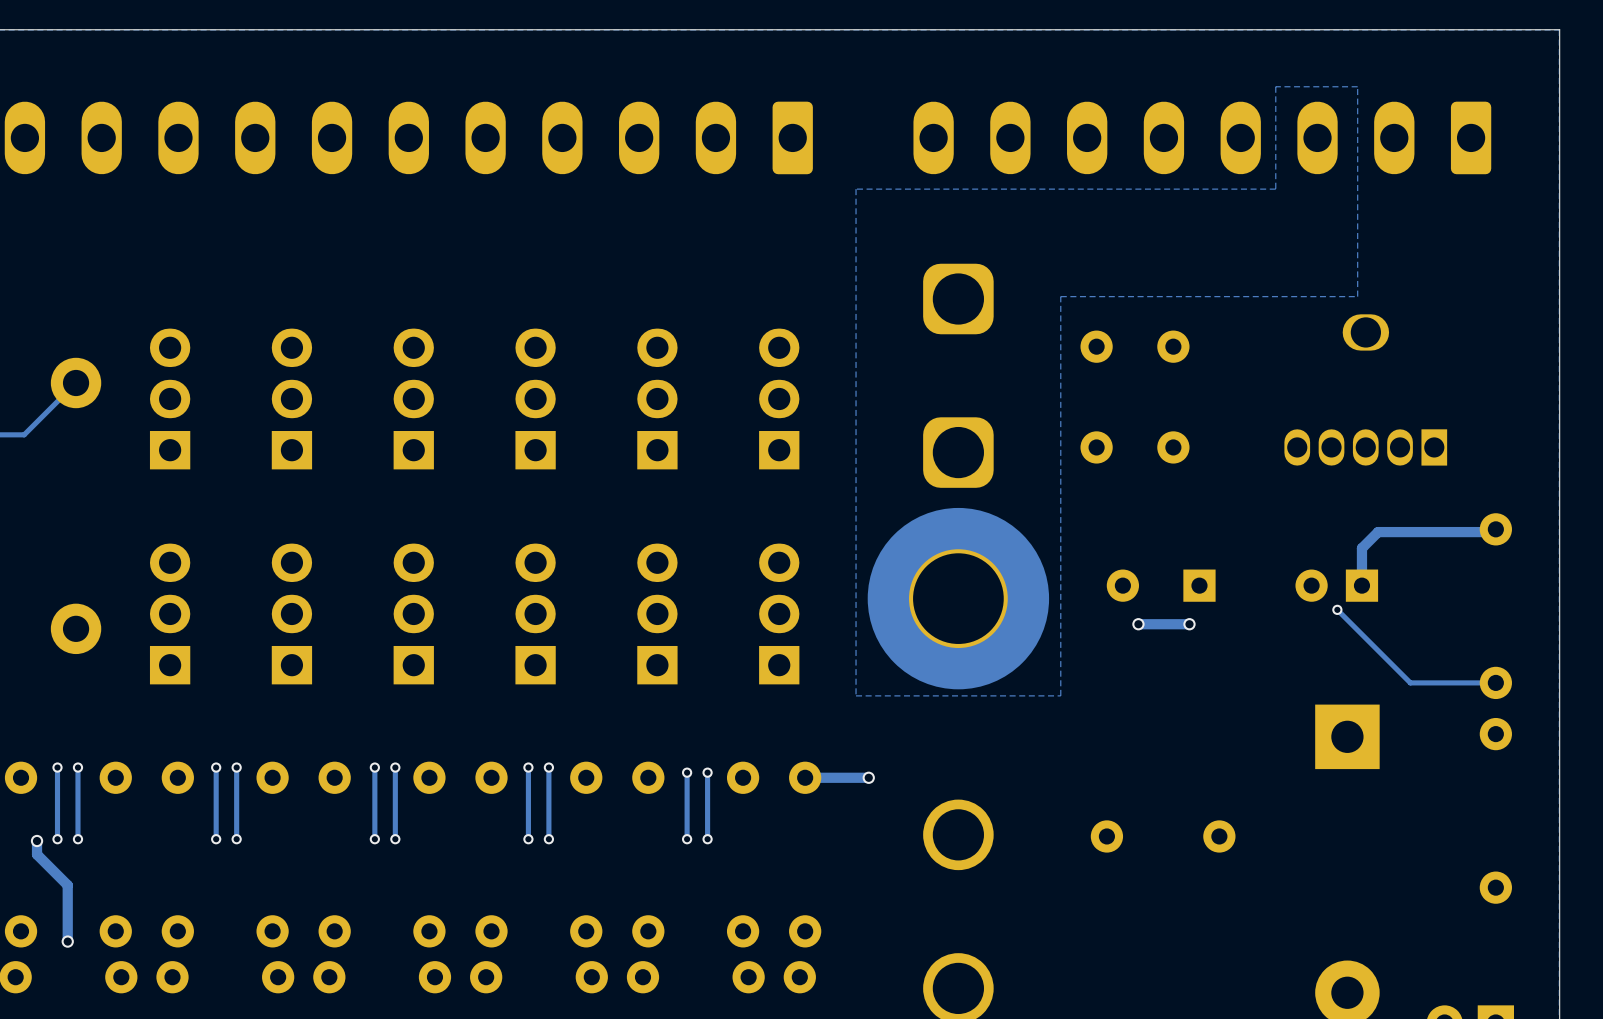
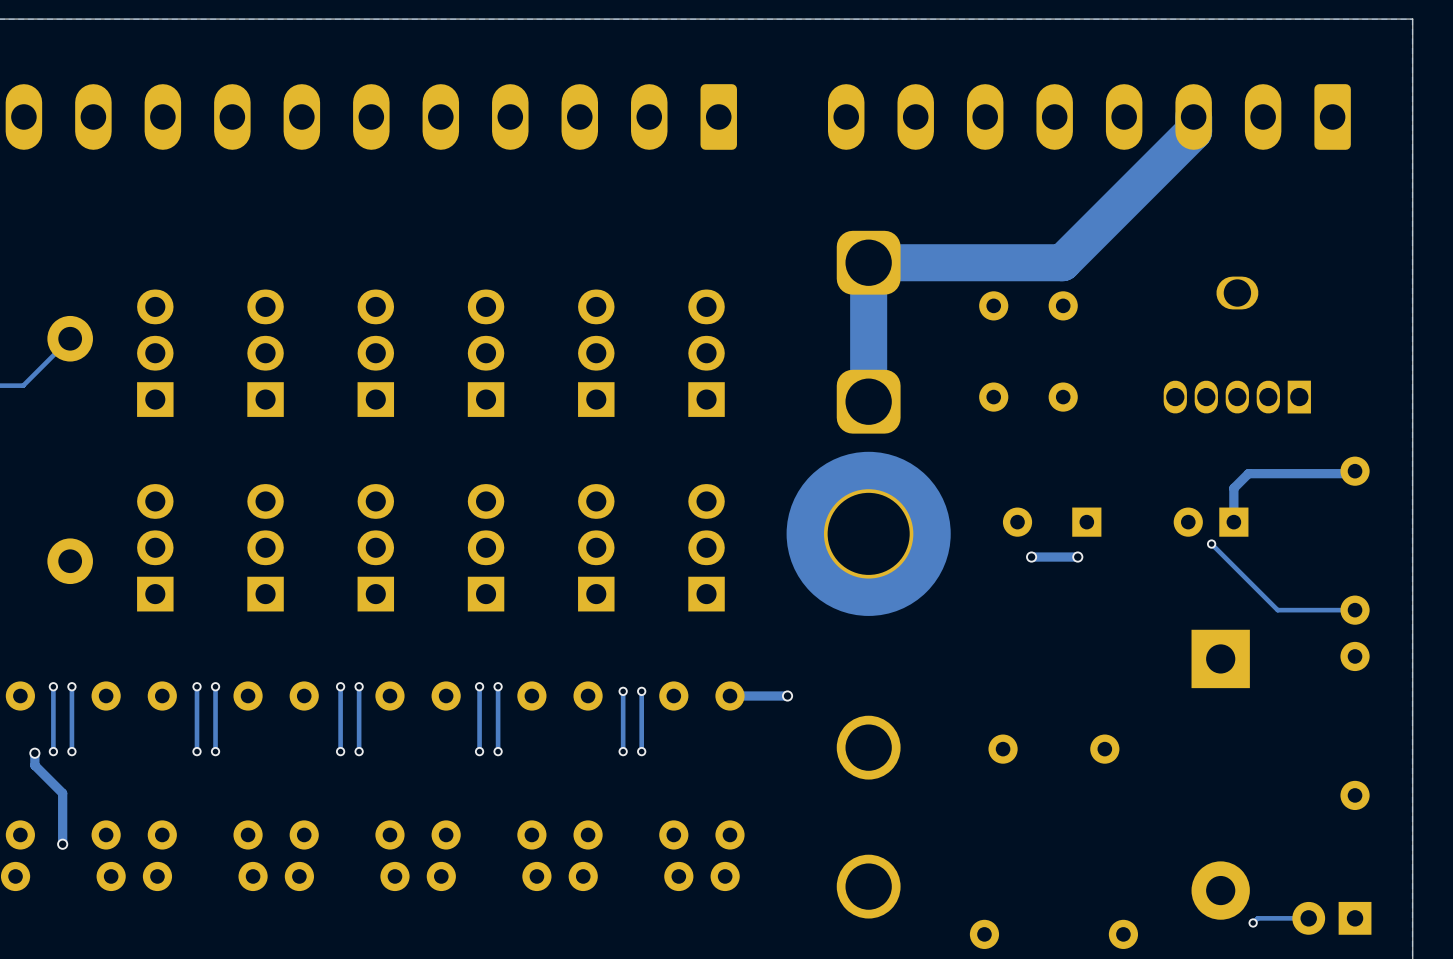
zone outline: (1357, 86) (1275, 86) (1275, 189) (856, 189) (856, 695) (1060, 695) (1060, 296) (1357, 296) (1357, 86) -> none
track: none -> (1193, 116) (1193, 131) (1062, 262) (868, 262) (868, 401)

